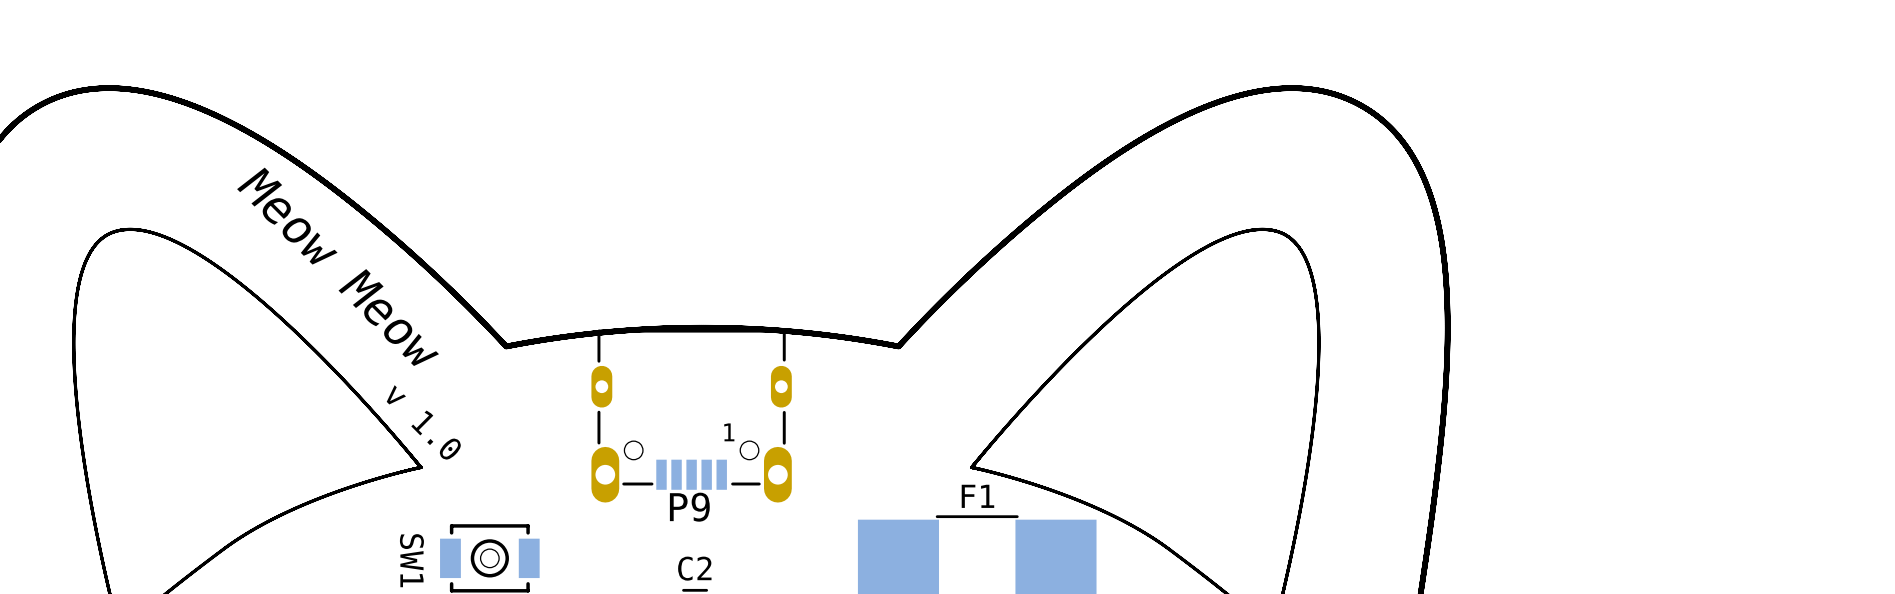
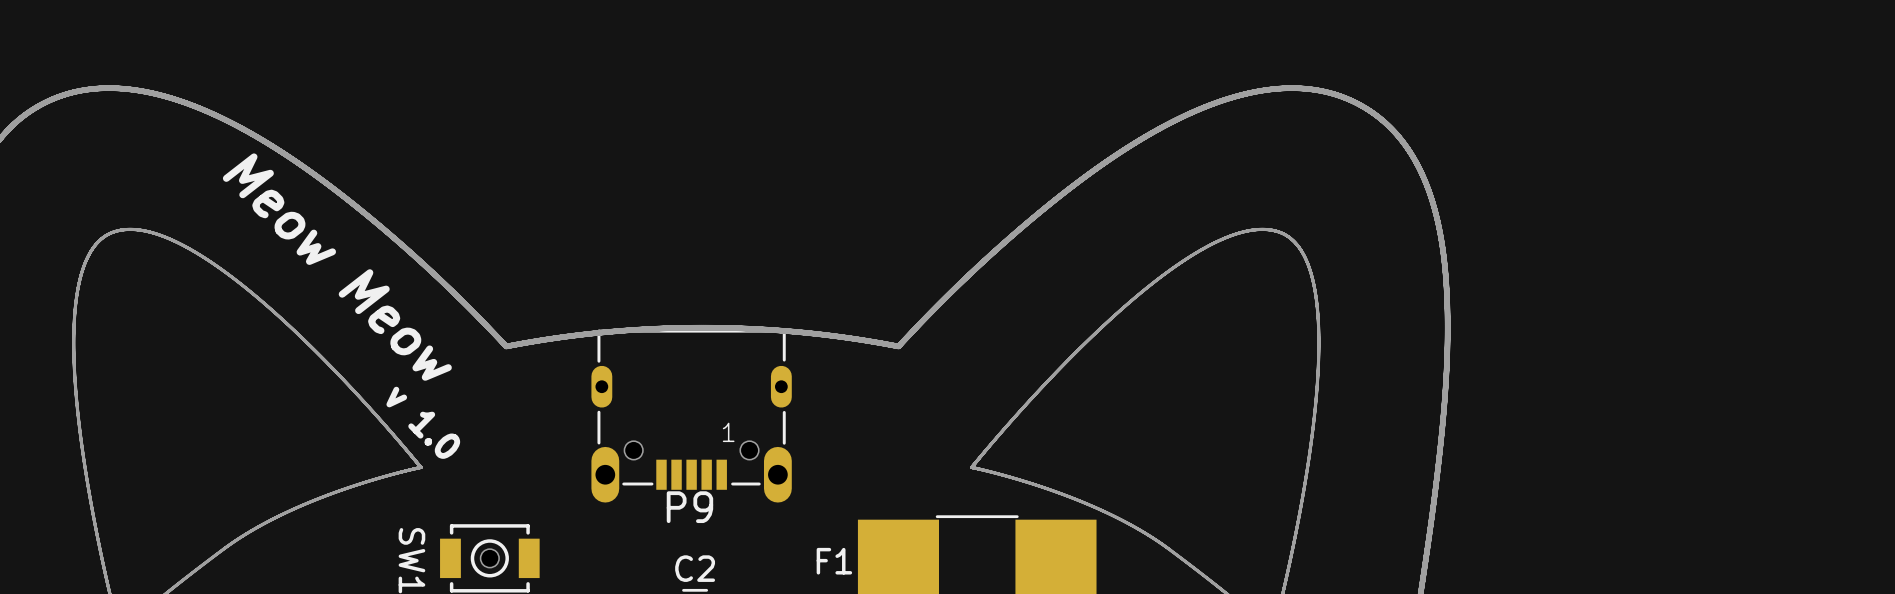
F1 name position: F1 (977, 496) -> F1 (834, 561)

